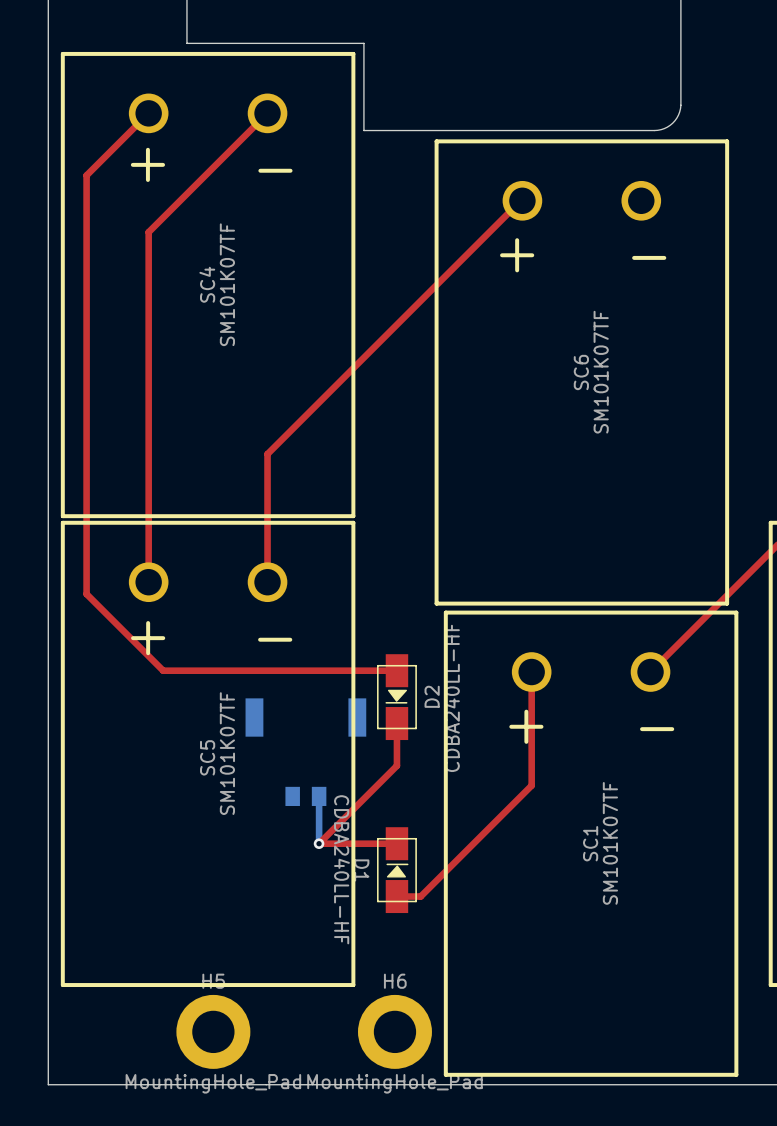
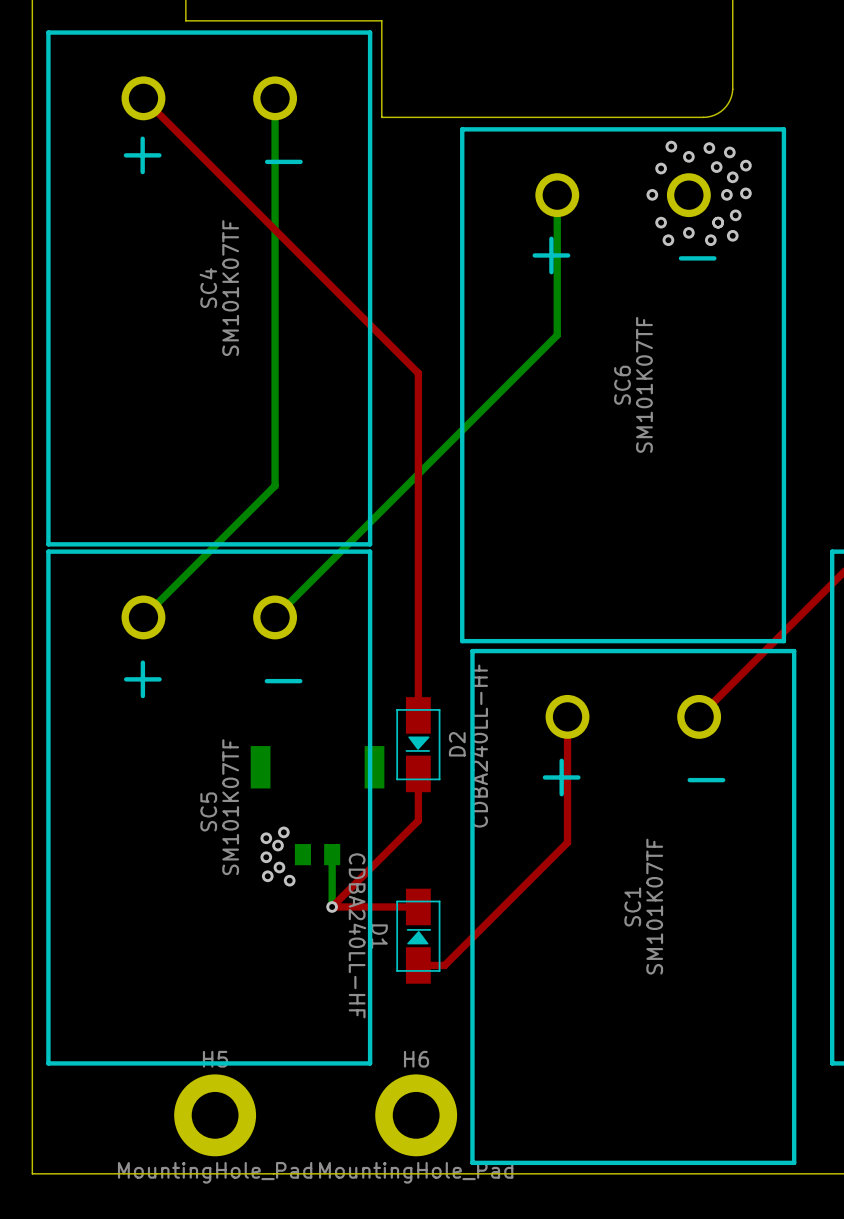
top track: (148, 113) (86, 175) (86, 594) (163, 670) (396, 670) -> (143, 98) (418, 373) (418, 715)
top track: (267, 113) (148, 232) (148, 582) -> none
bottom track: none -> (275, 98) (275, 485) (143, 617)
via: none -> (671, 146)
via: none -> (709, 148)
via: none -> (729, 152)
via: none -> (688, 156)
via: none -> (745, 165)
via: none -> (716, 167)
via: none -> (661, 168)
via: none -> (732, 177)
via: none -> (745, 193)
top track: (520, 200) (267, 454) (267, 582) -> none
bottom track: none -> (557, 195) (557, 335) (275, 617)
via: none -> (652, 194)
via: none -> (726, 194)
via: none -> (735, 215)
via: none -> (661, 222)
via: none -> (718, 222)
via: none -> (688, 232)
via: none -> (732, 235)
via: none -> (668, 240)
via: none -> (710, 240)
via: none -> (283, 832)
via: none -> (266, 838)
via: none -> (277, 845)
via: none -> (266, 857)
via: none -> (279, 867)
via: none -> (267, 876)
via: none -> (289, 880)

